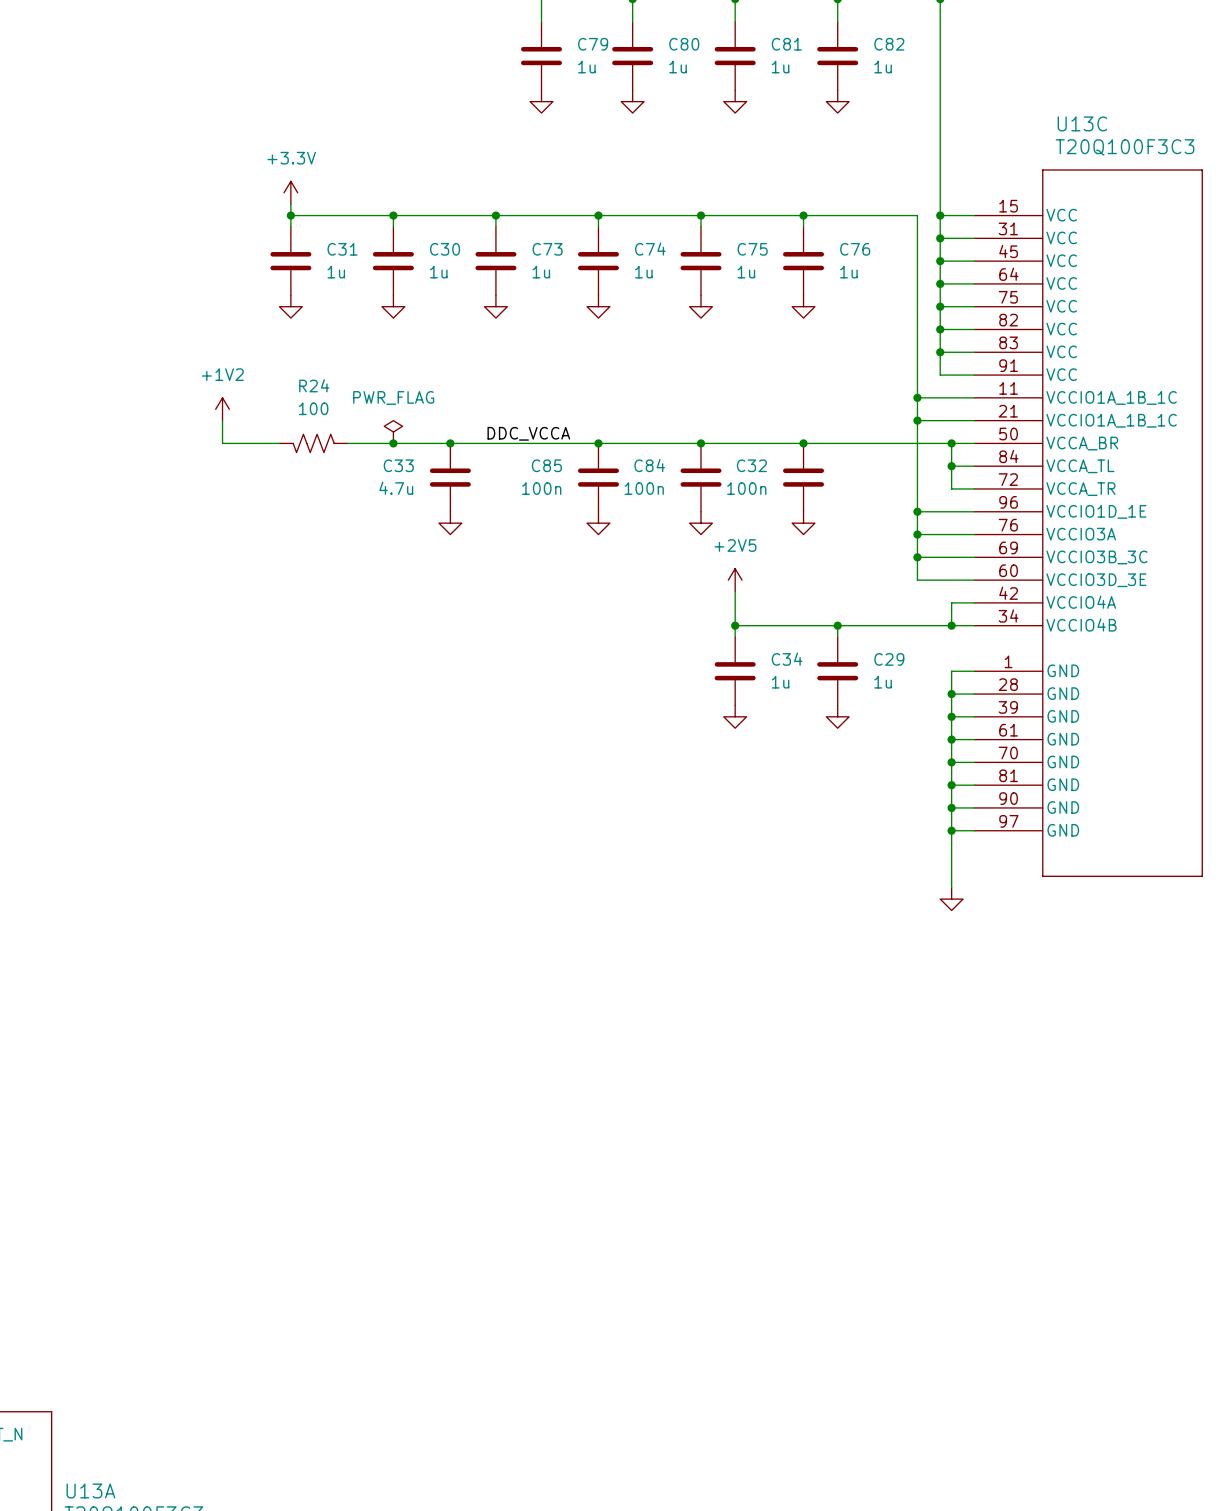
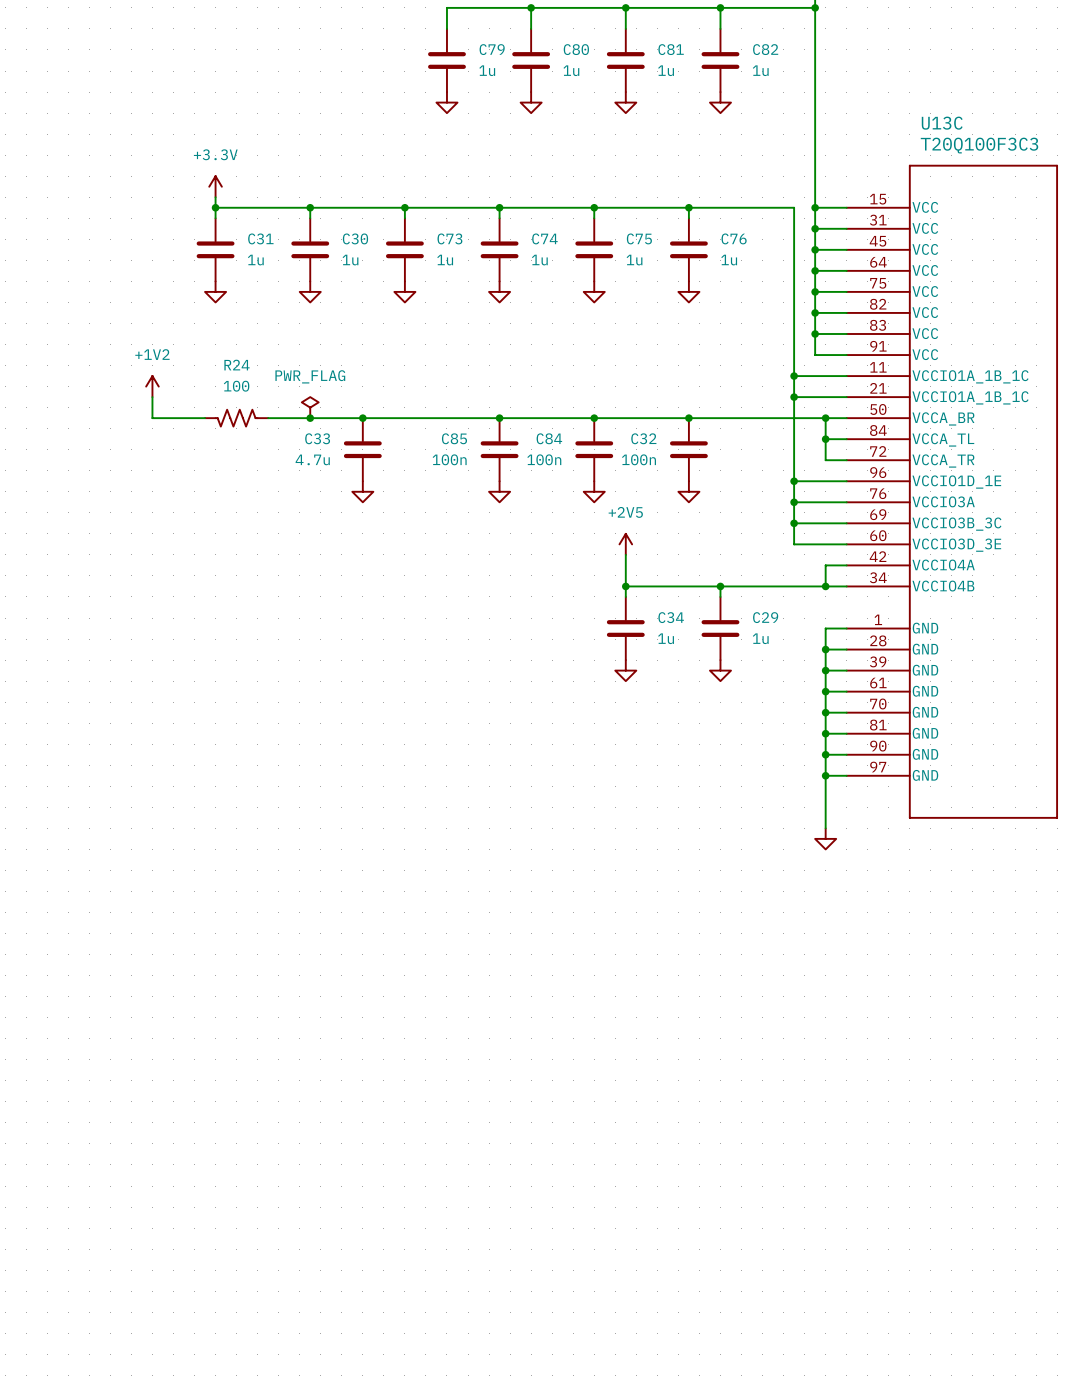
label: DDC_VCCA (528, 433) -> none

